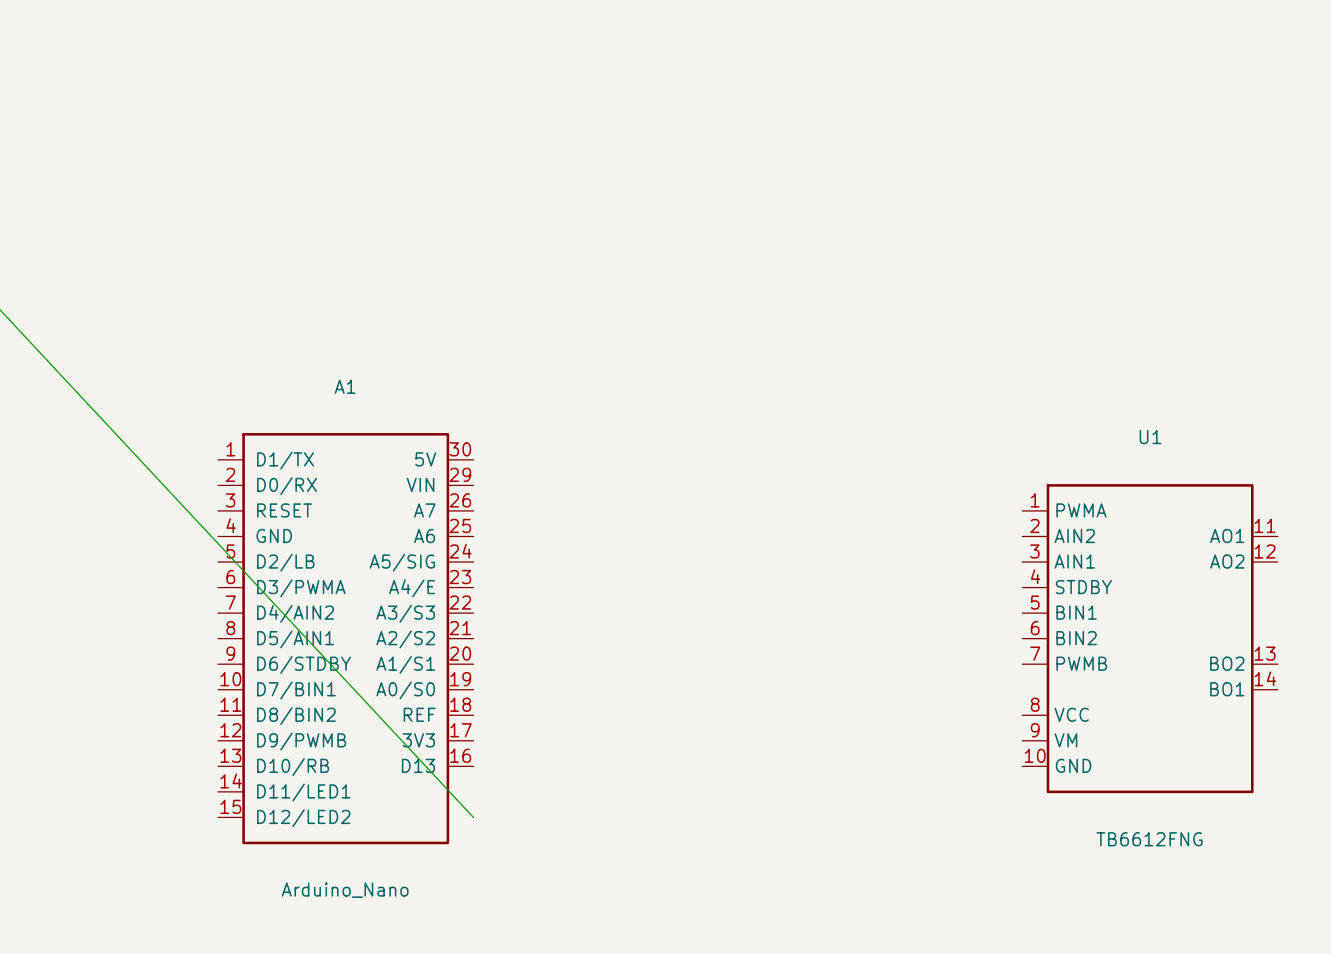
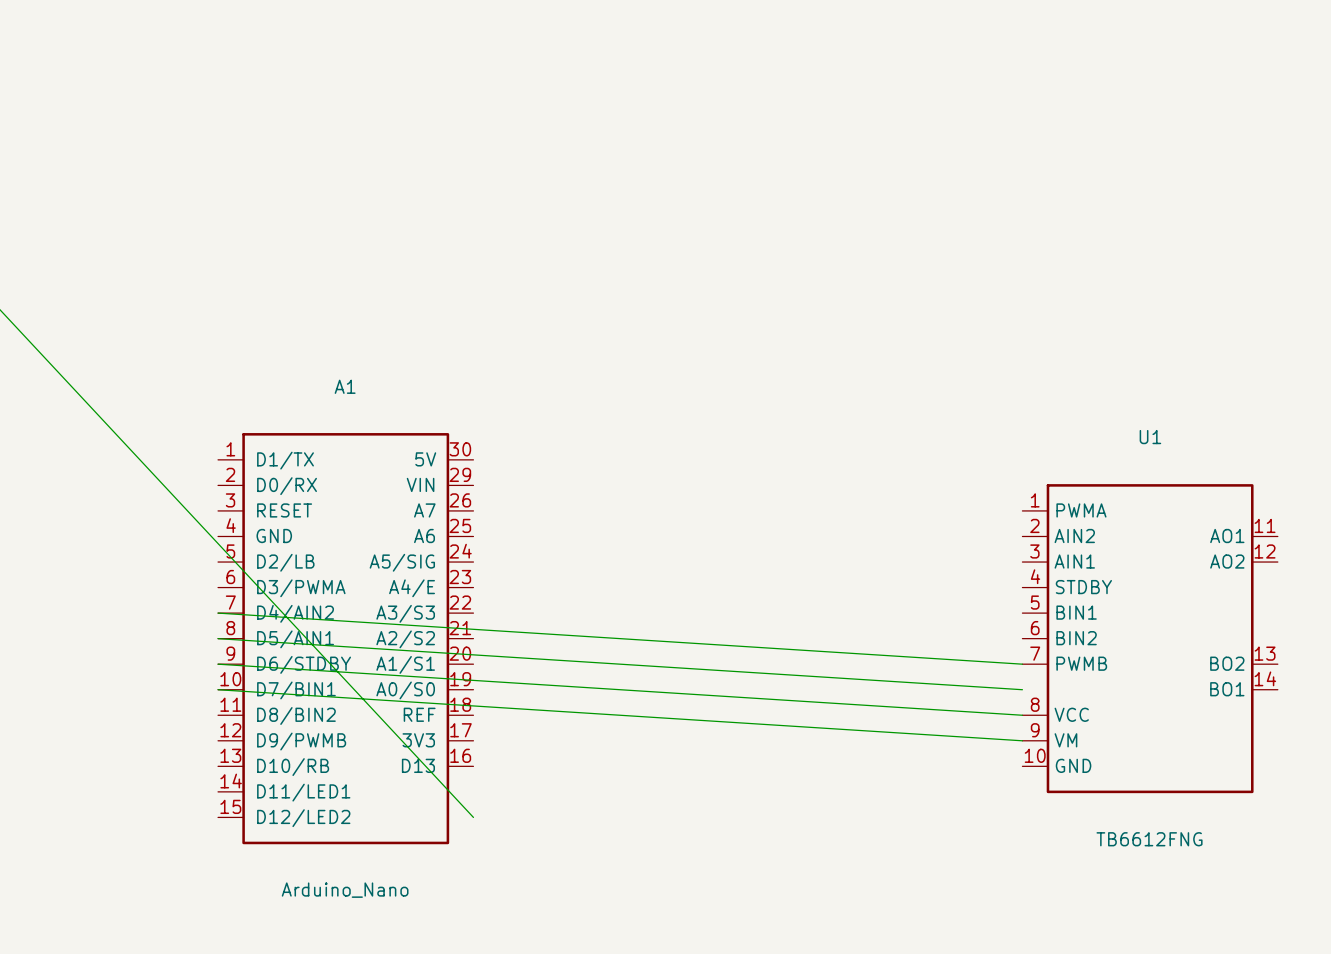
wire: none -> (218, 613) (1022, 664)
wire: none -> (218, 638) (1022, 689)
wire: none -> (218, 664) (1022, 715)
wire: none -> (218, 689) (1022, 740)

